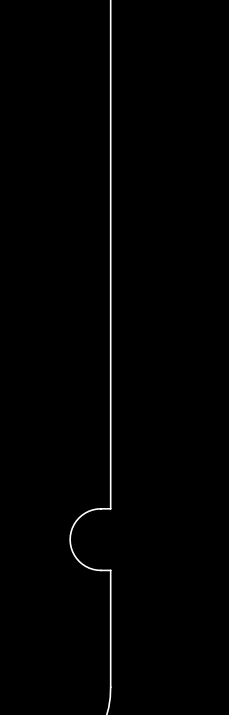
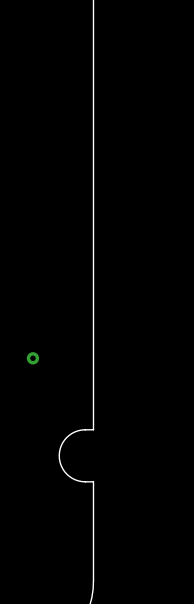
via: none -> (32, 358)

